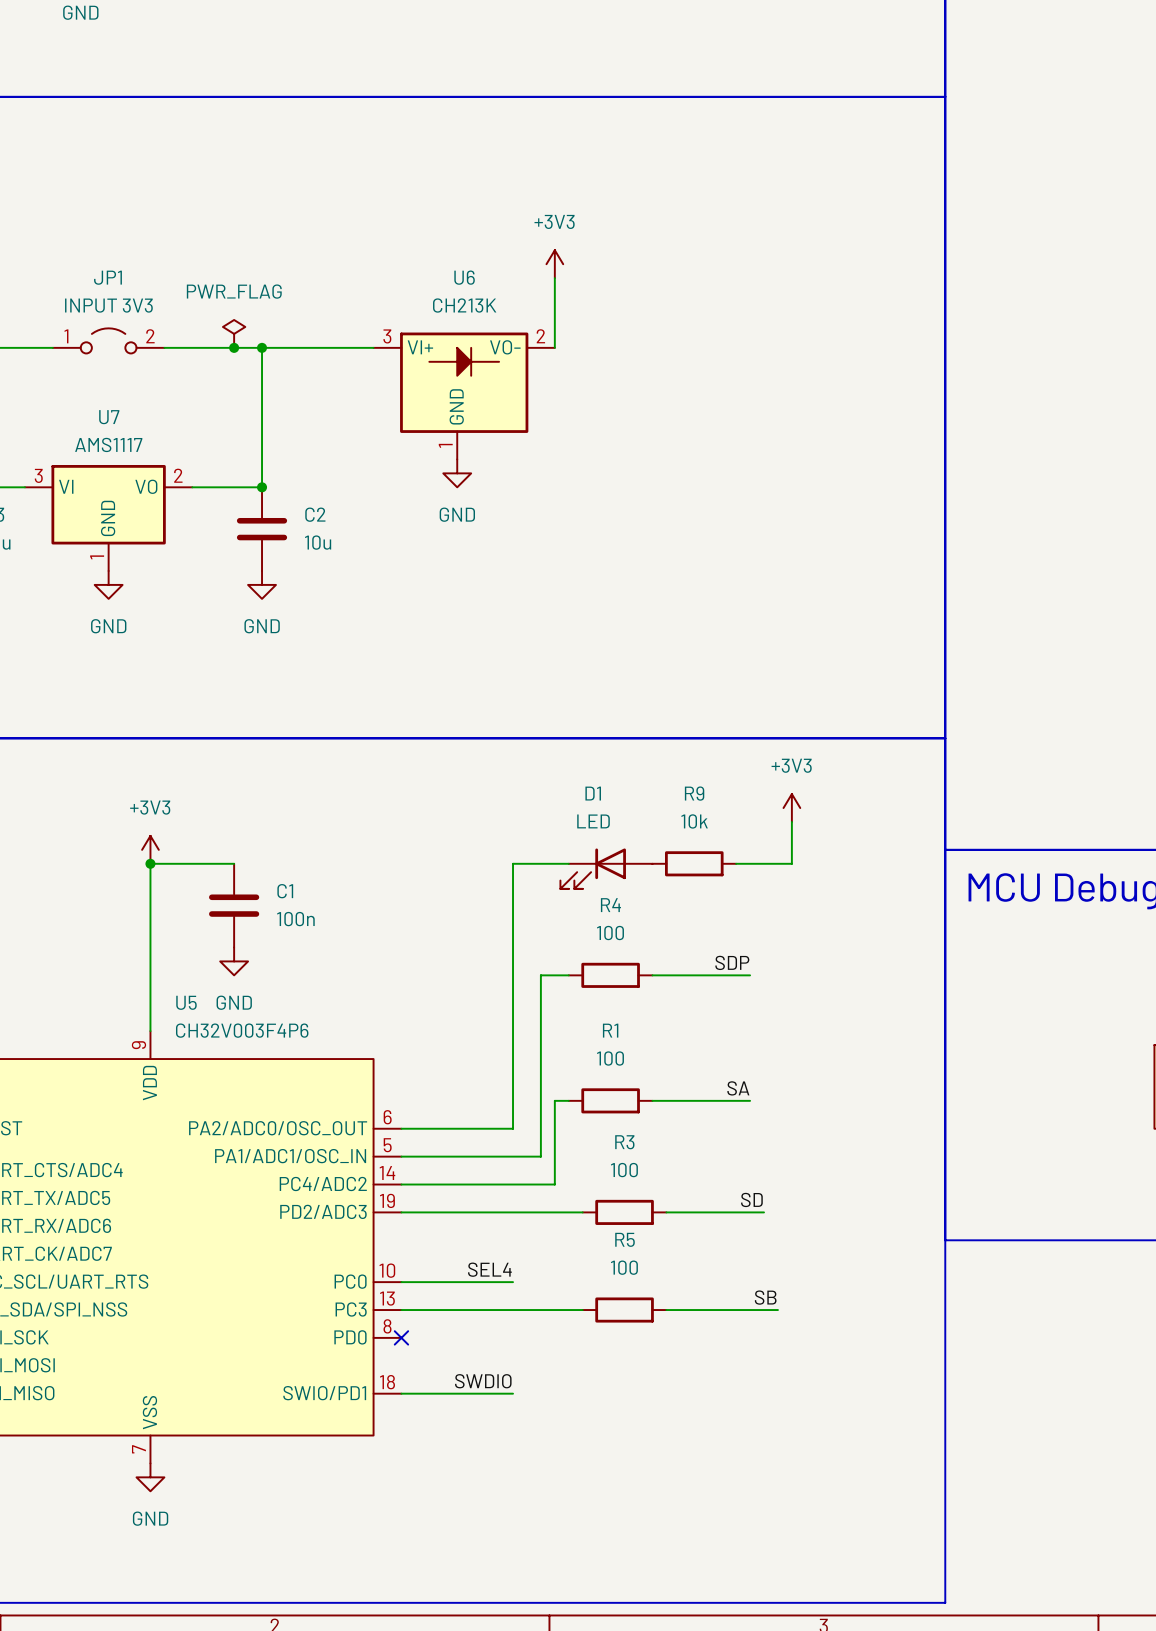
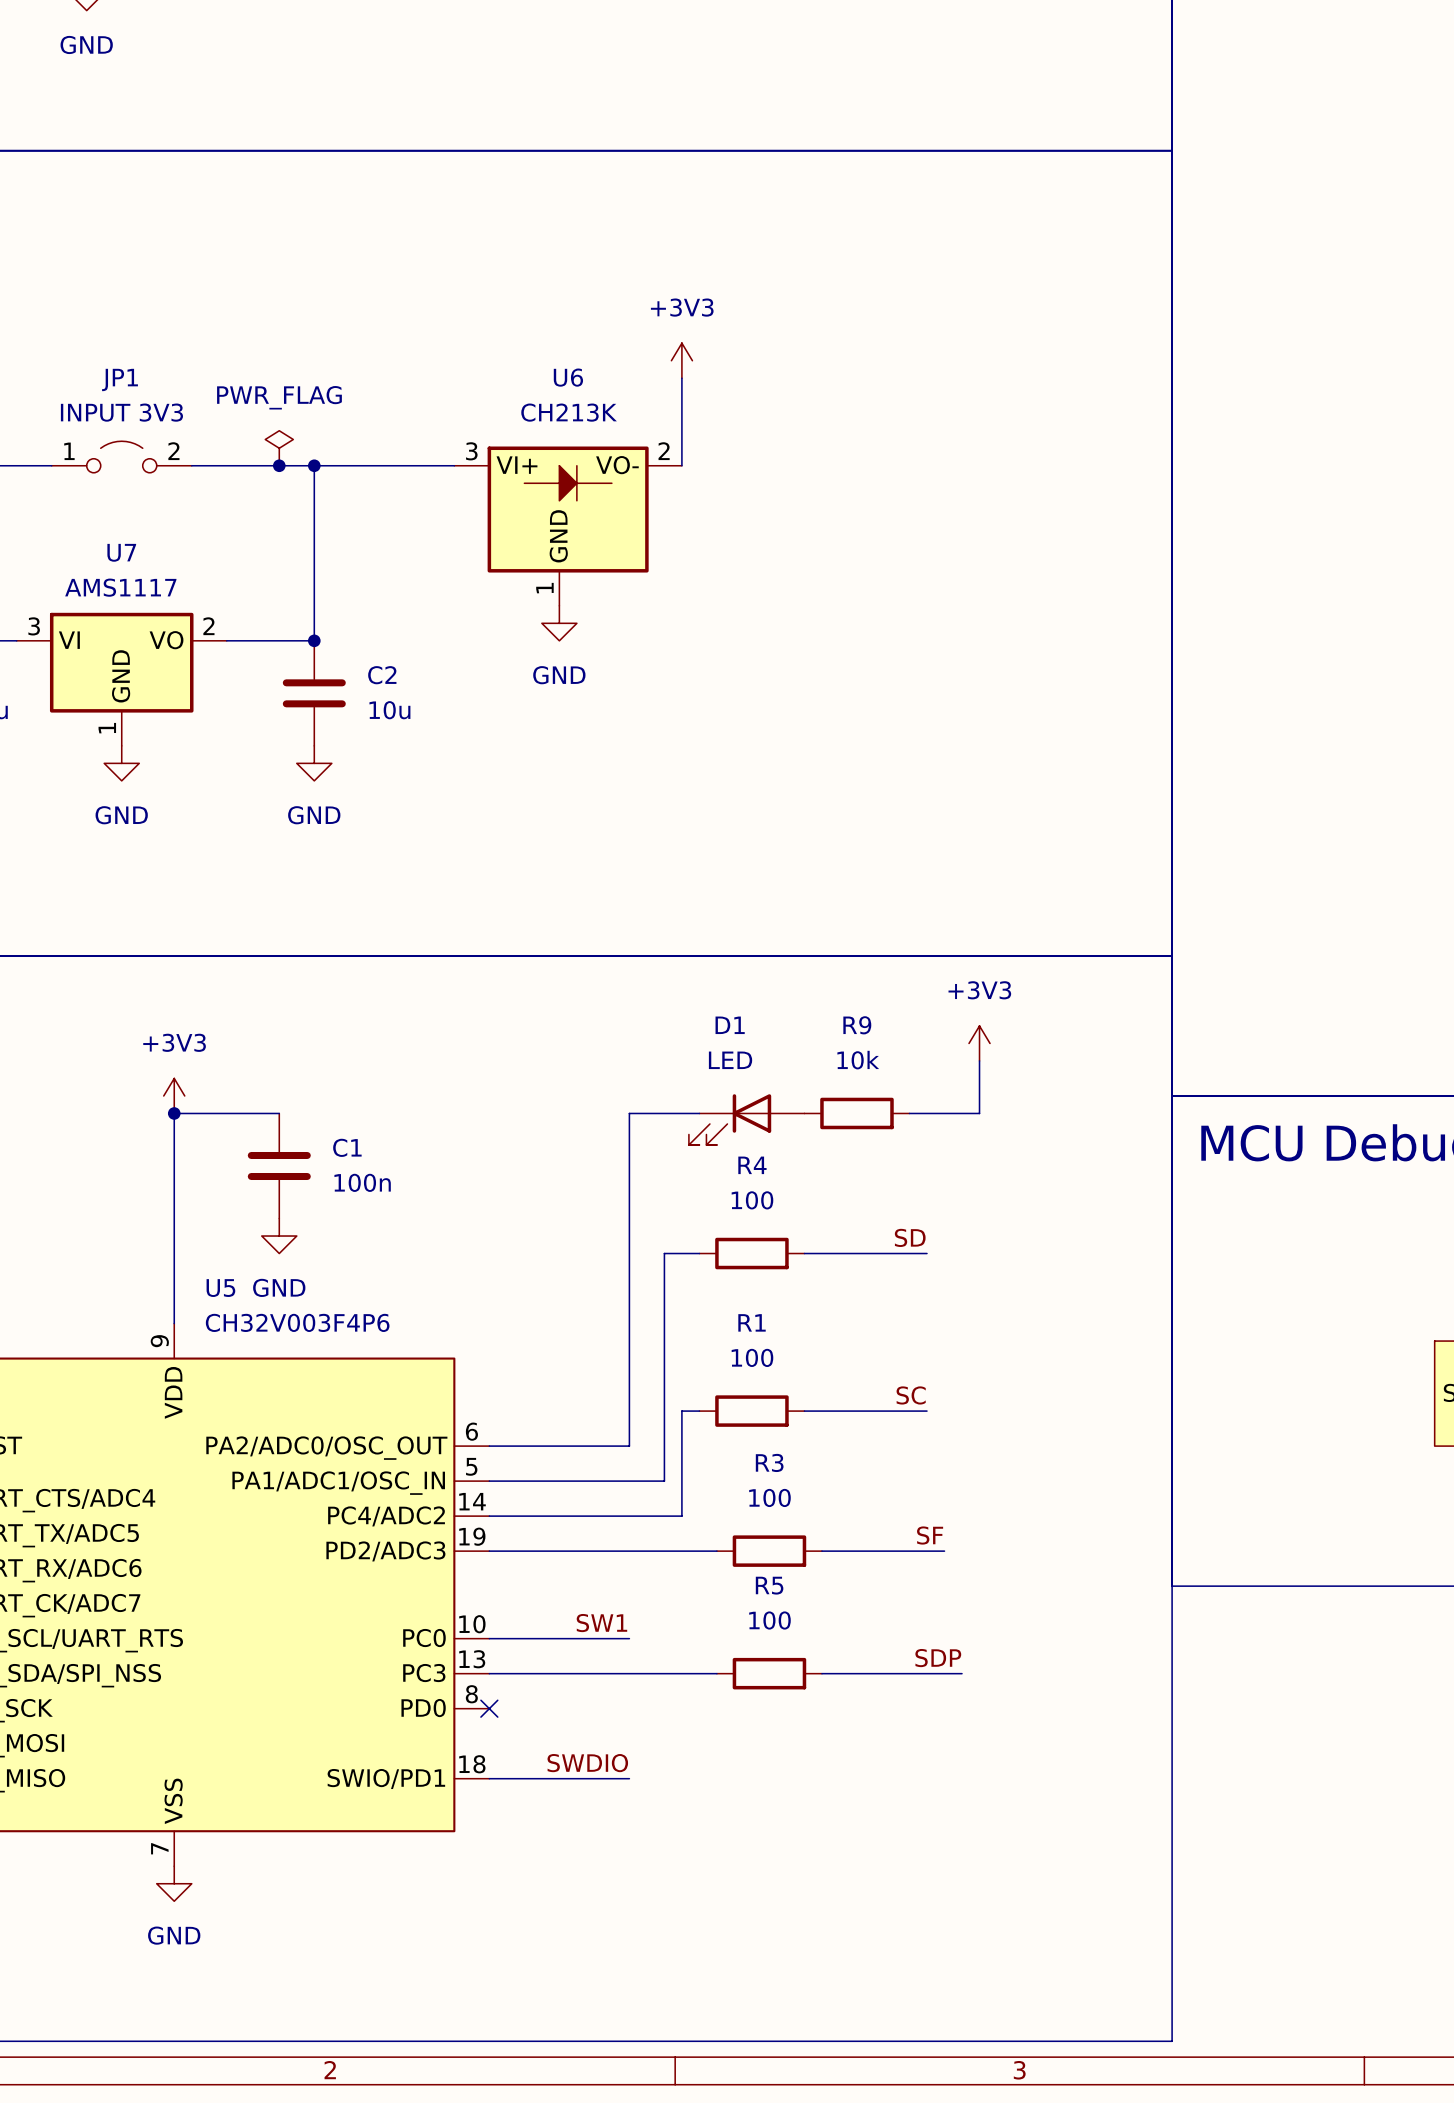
label: SDP (732, 962) -> SD (910, 1237)
label: SA (738, 1088) -> SC (911, 1395)
label: SD (751, 1199) -> SF (930, 1535)
label: SEL4 (489, 1269) -> SW1 (601, 1623)
label: SB (765, 1297) -> SDP (938, 1658)

